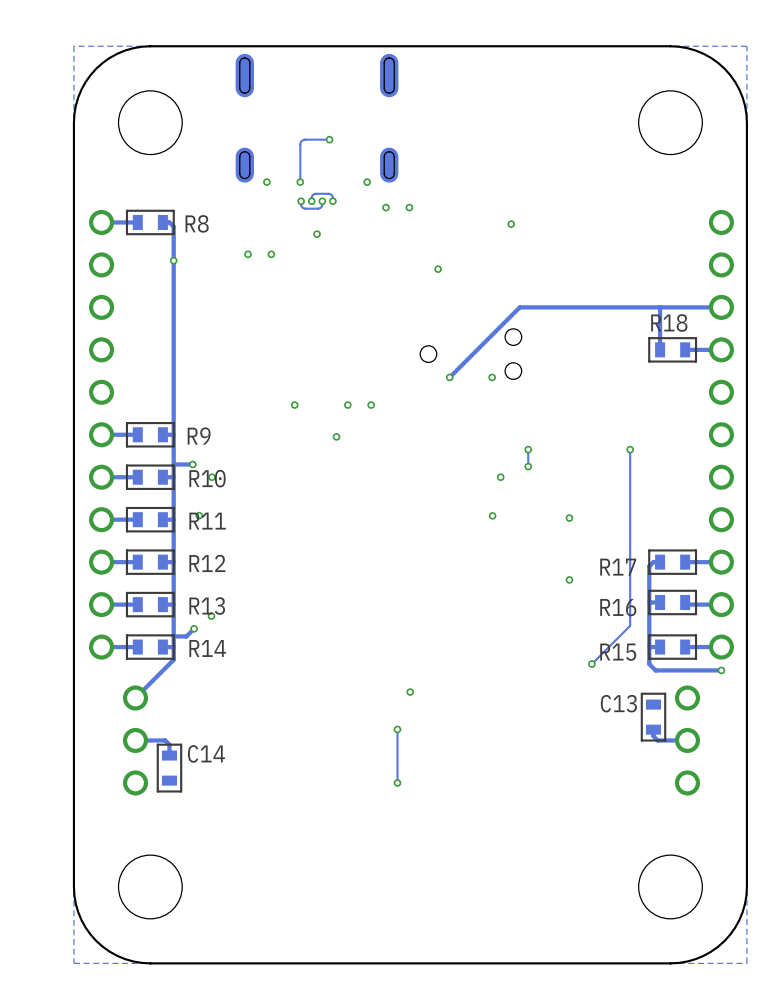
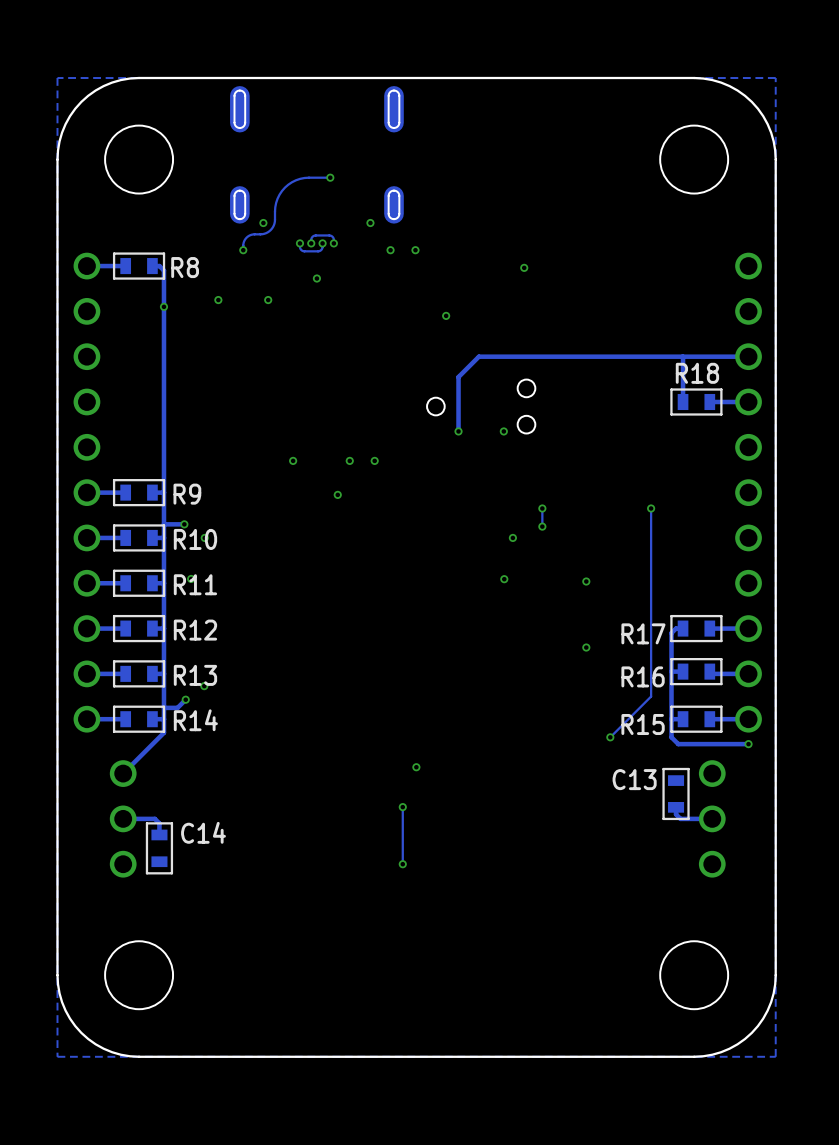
track: (309, 139) (303, 140) (300, 143) (300, 182) -> (308, 177) (295, 180) (284, 187) (276, 202) (273, 227) (265, 233) (247, 236) (243, 242) (243, 250)
via: (300, 182) -> none
via: none -> (243, 250)
via: none -> (218, 300)
via: (248, 254) -> none
track: (519, 307) (449, 377) -> (533, 356) (478, 356) (458, 377) (458, 431)

